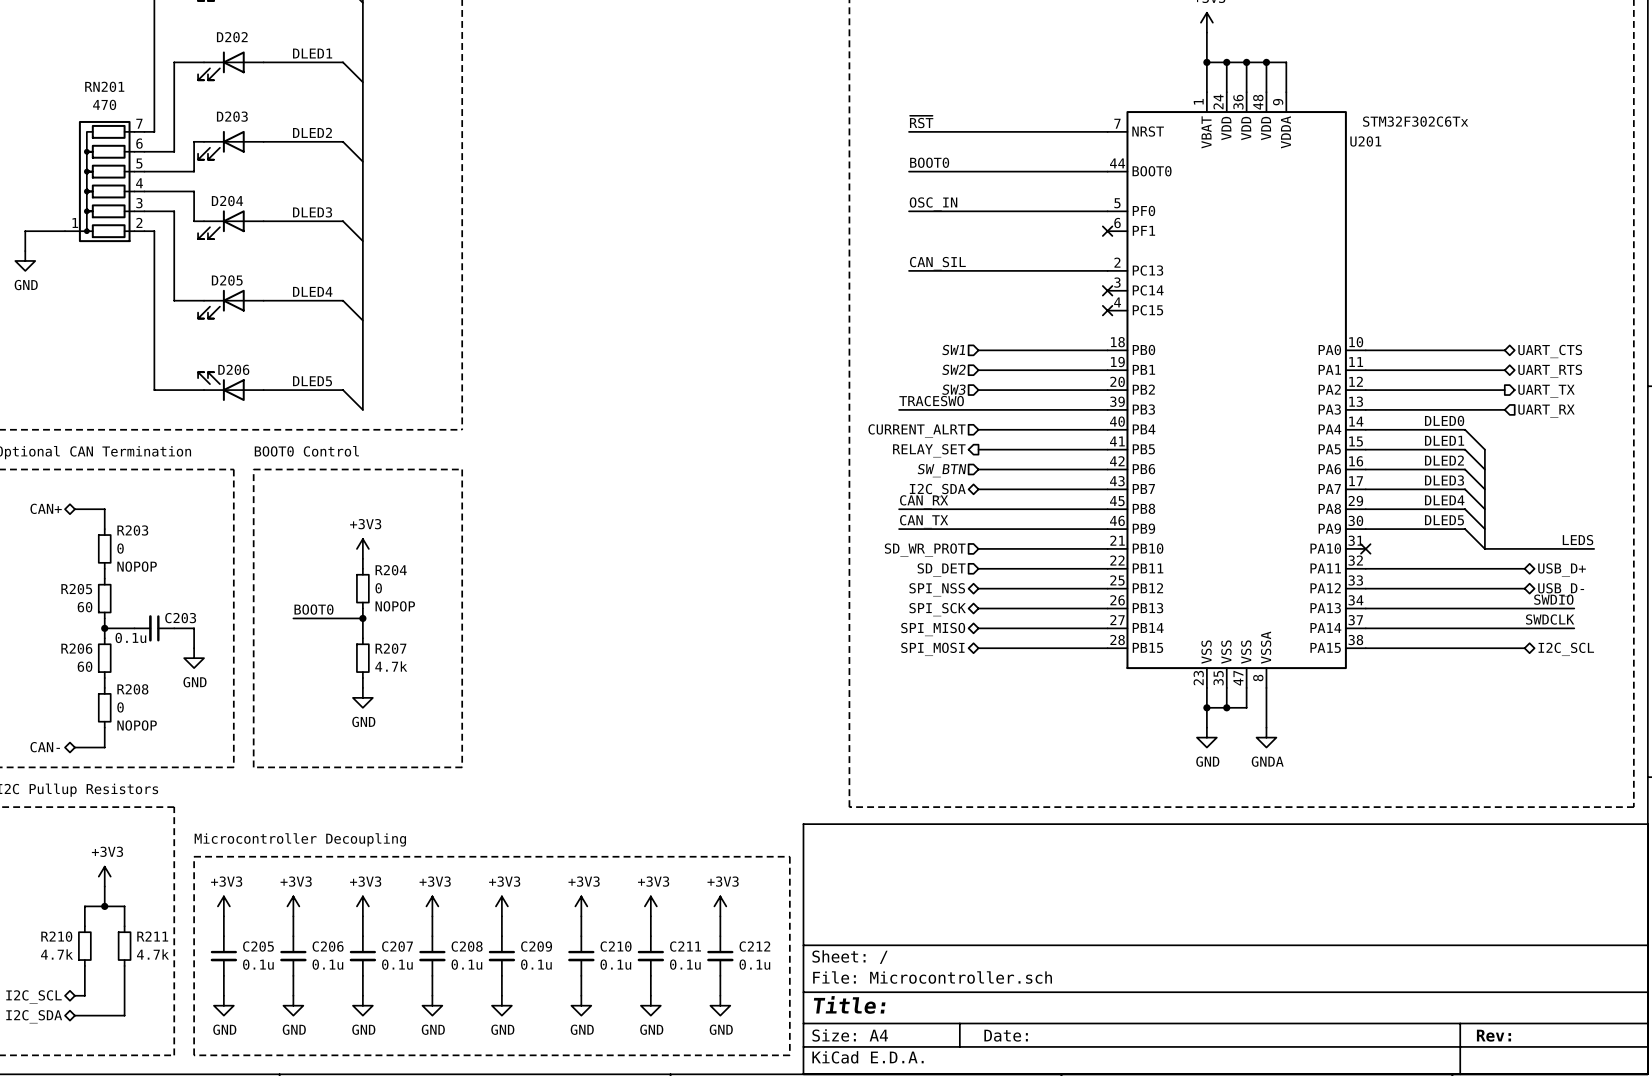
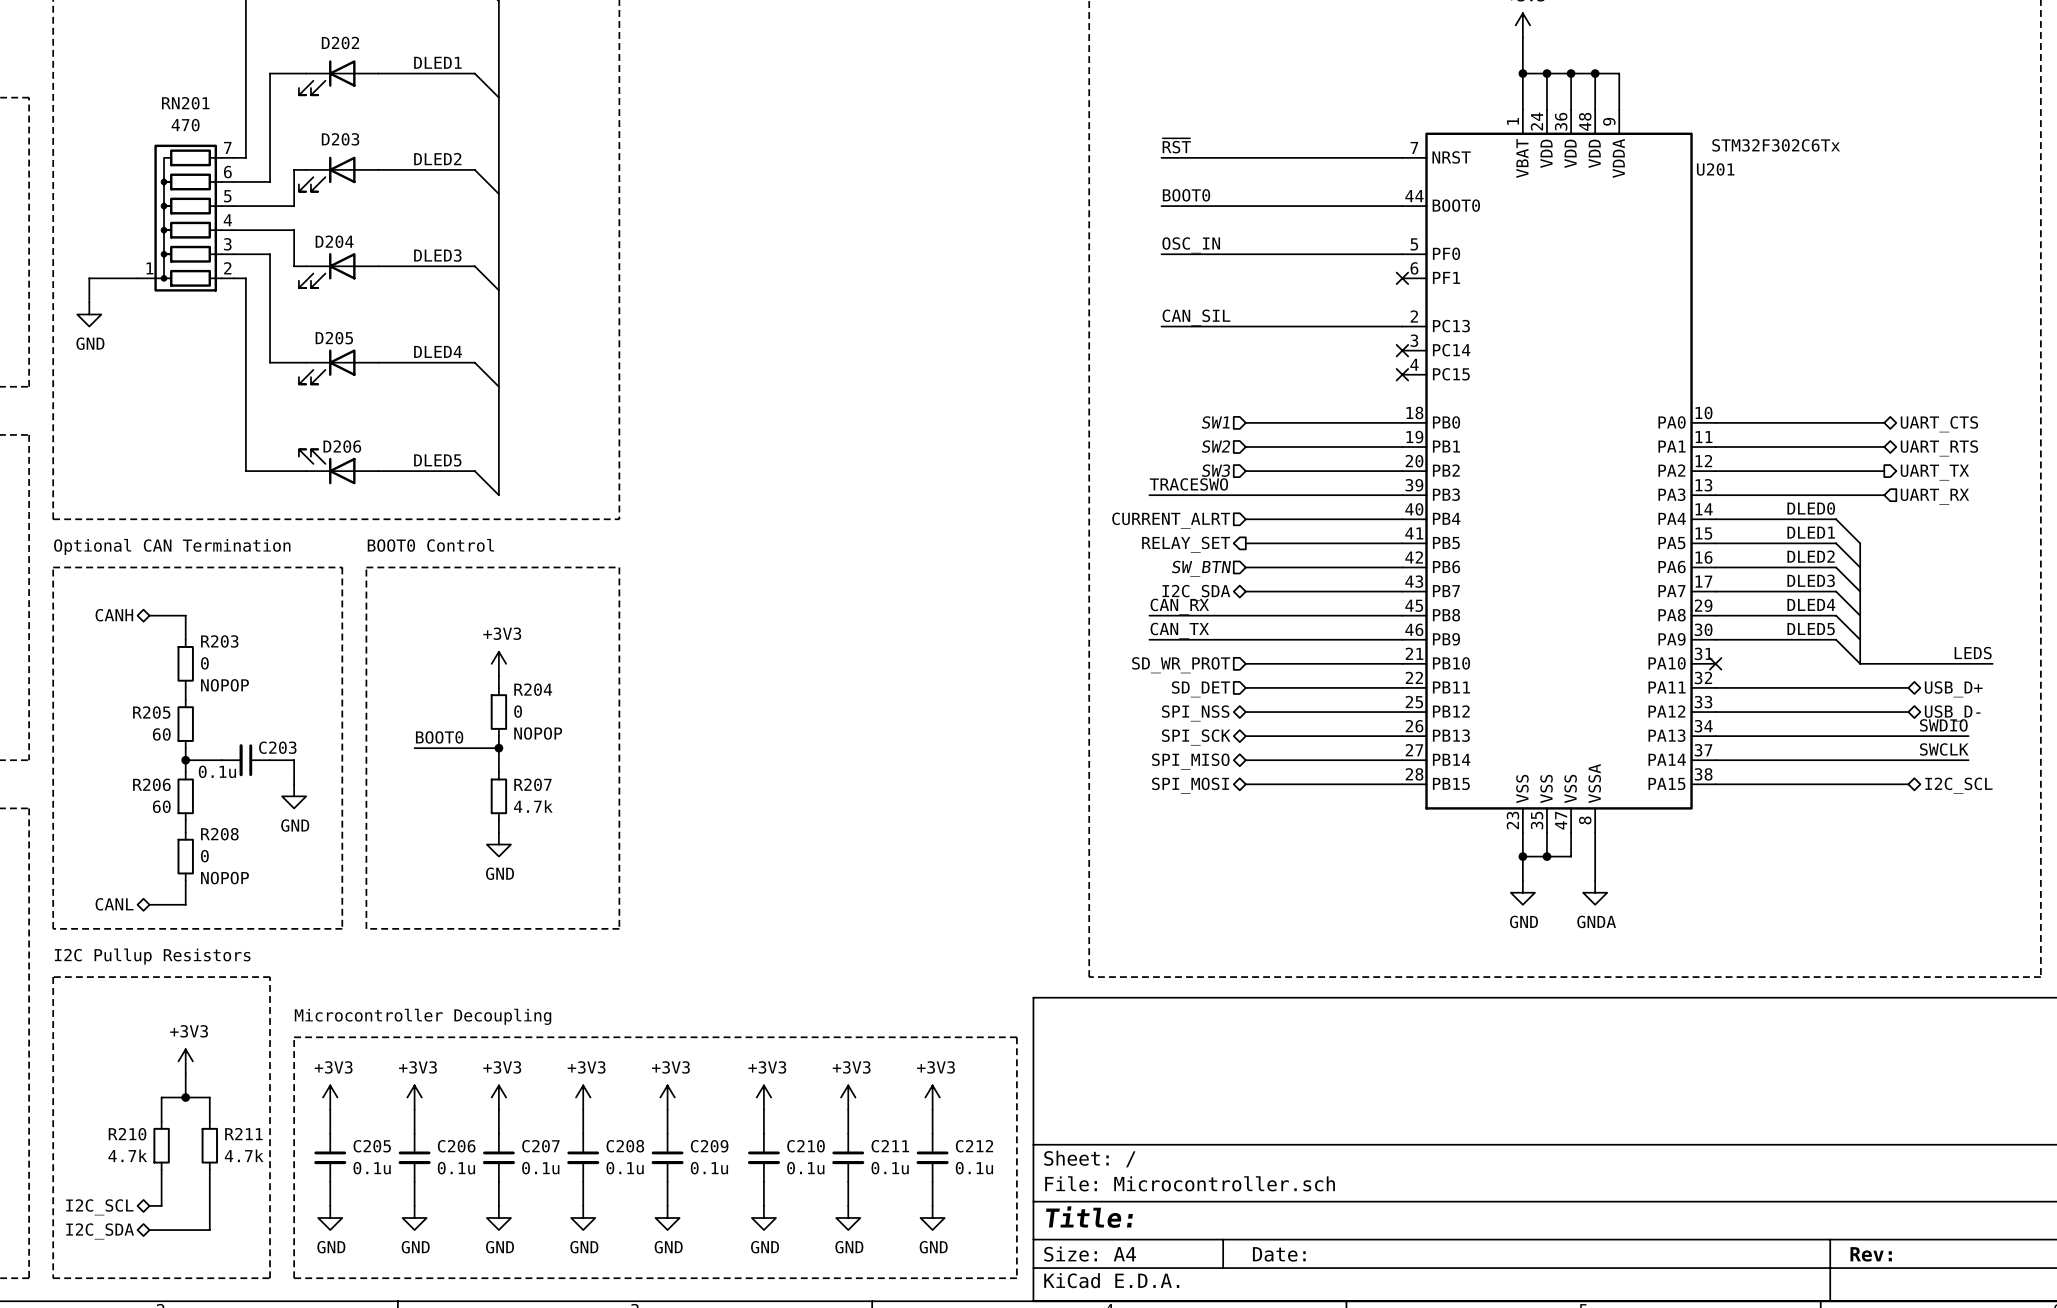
hierarchical label: CAN+ (46, 508) -> CANH (114, 615)
label: SWDCLK (1550, 619) -> SWCLK (1944, 749)
hierarchical label: CAN- (45, 747) -> CANL (114, 904)

